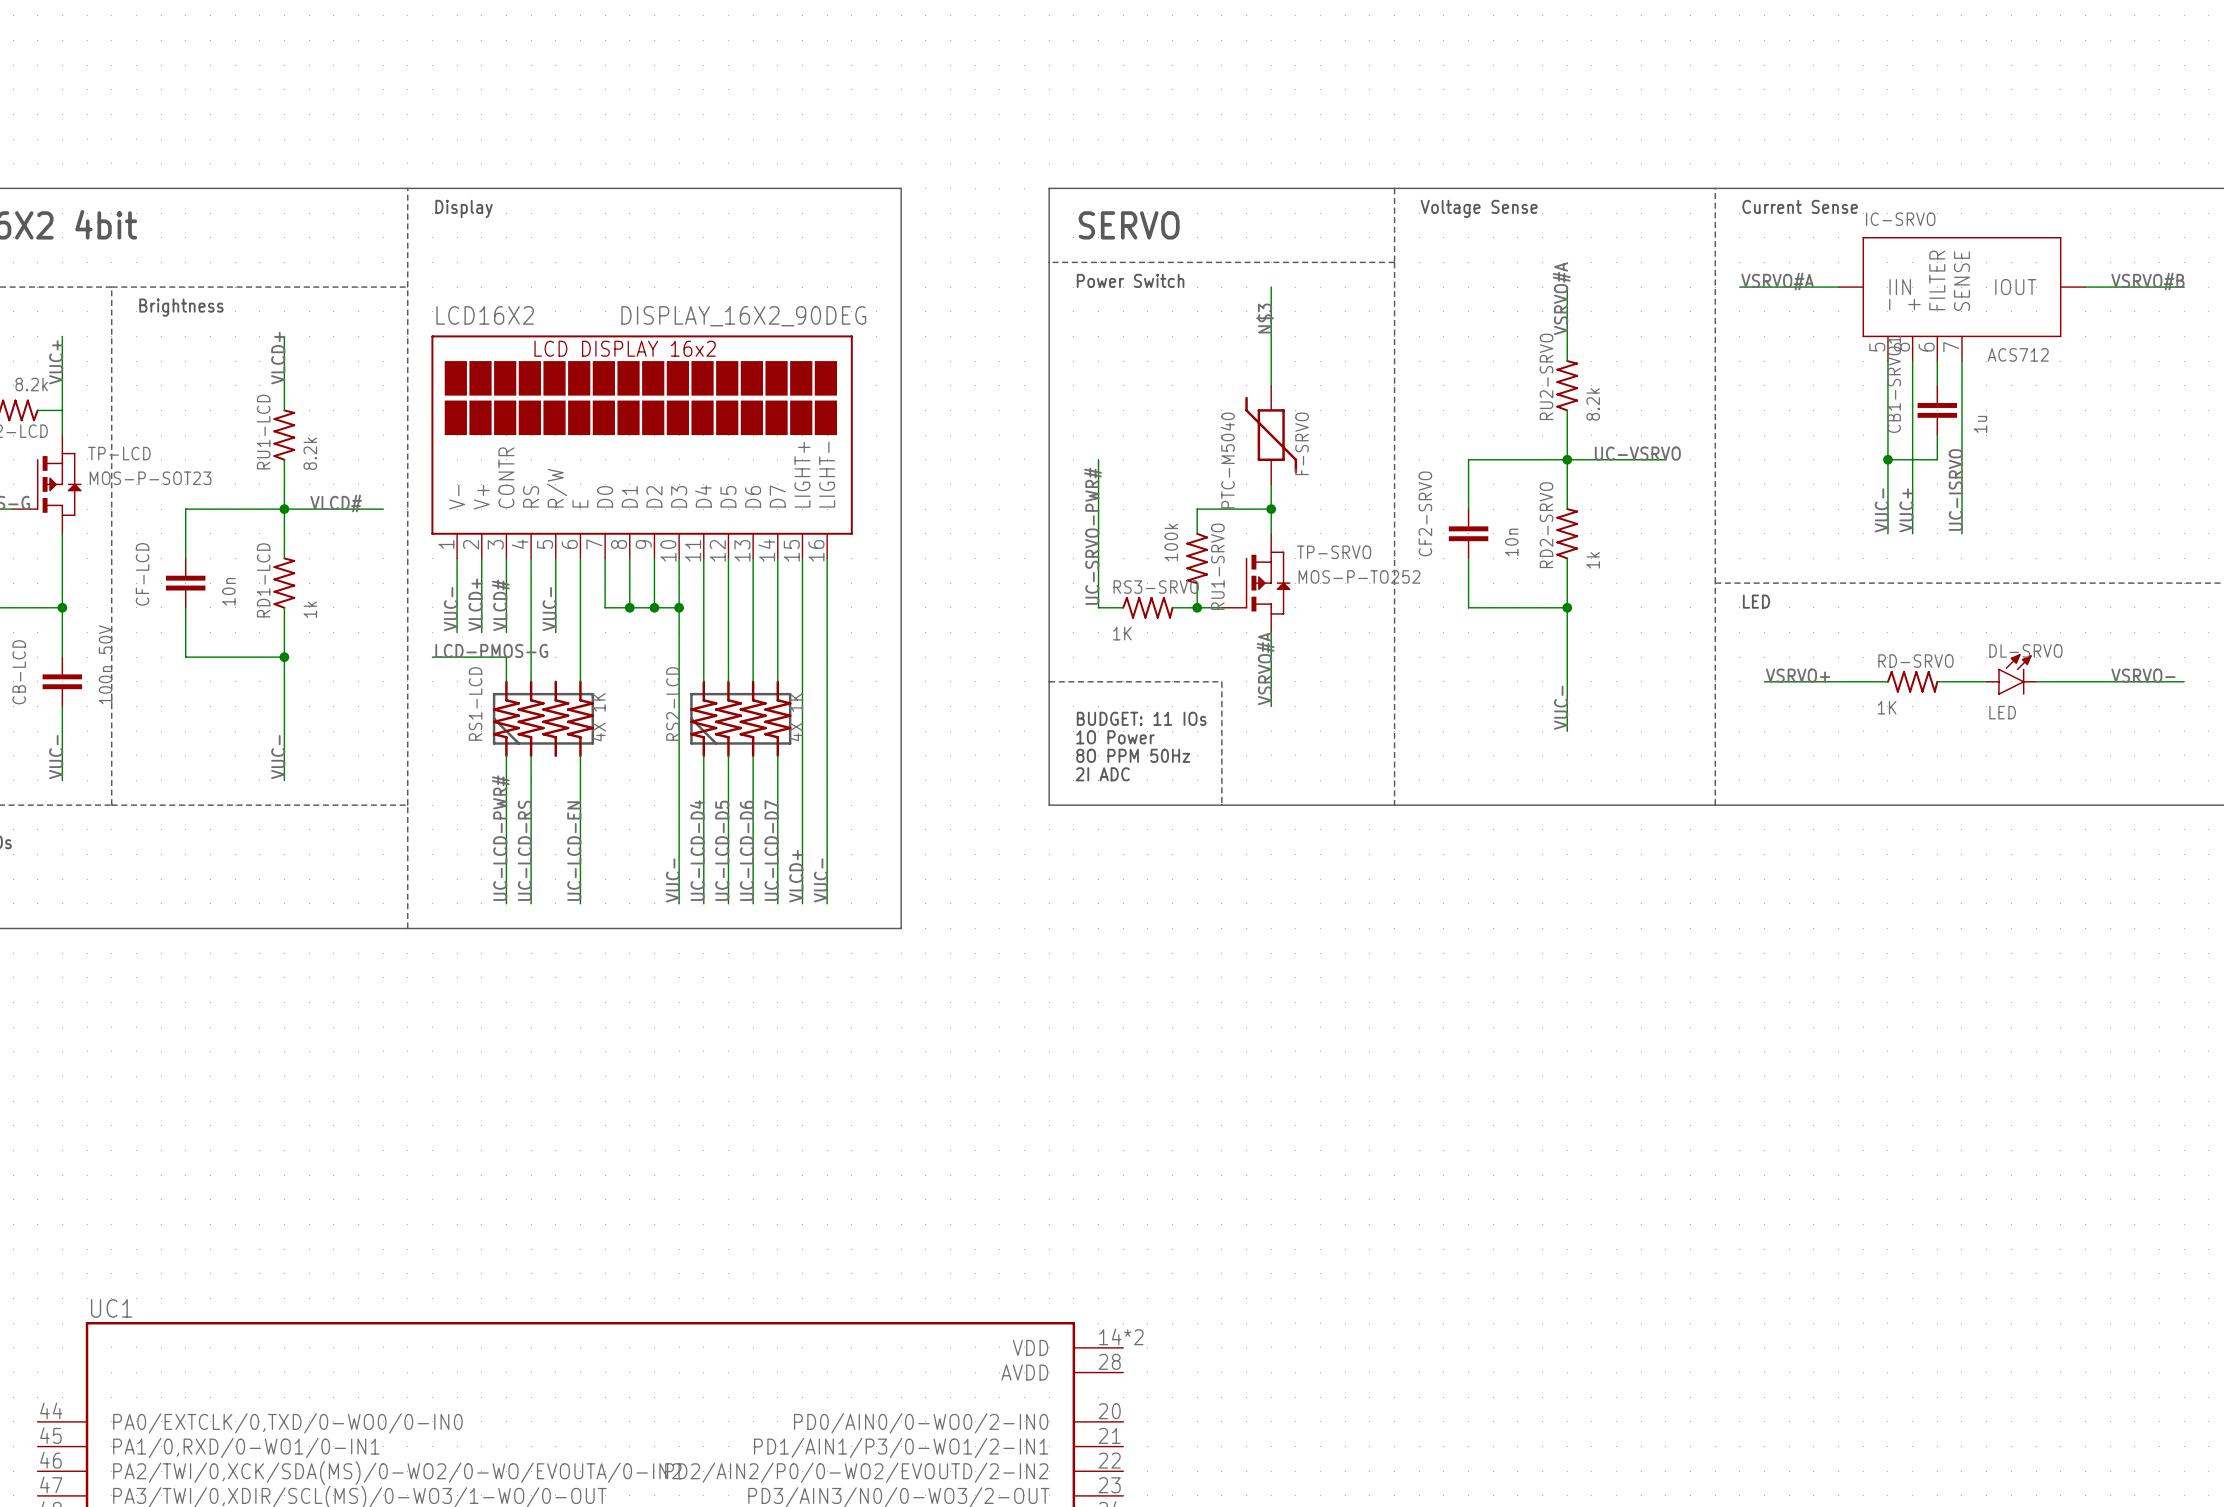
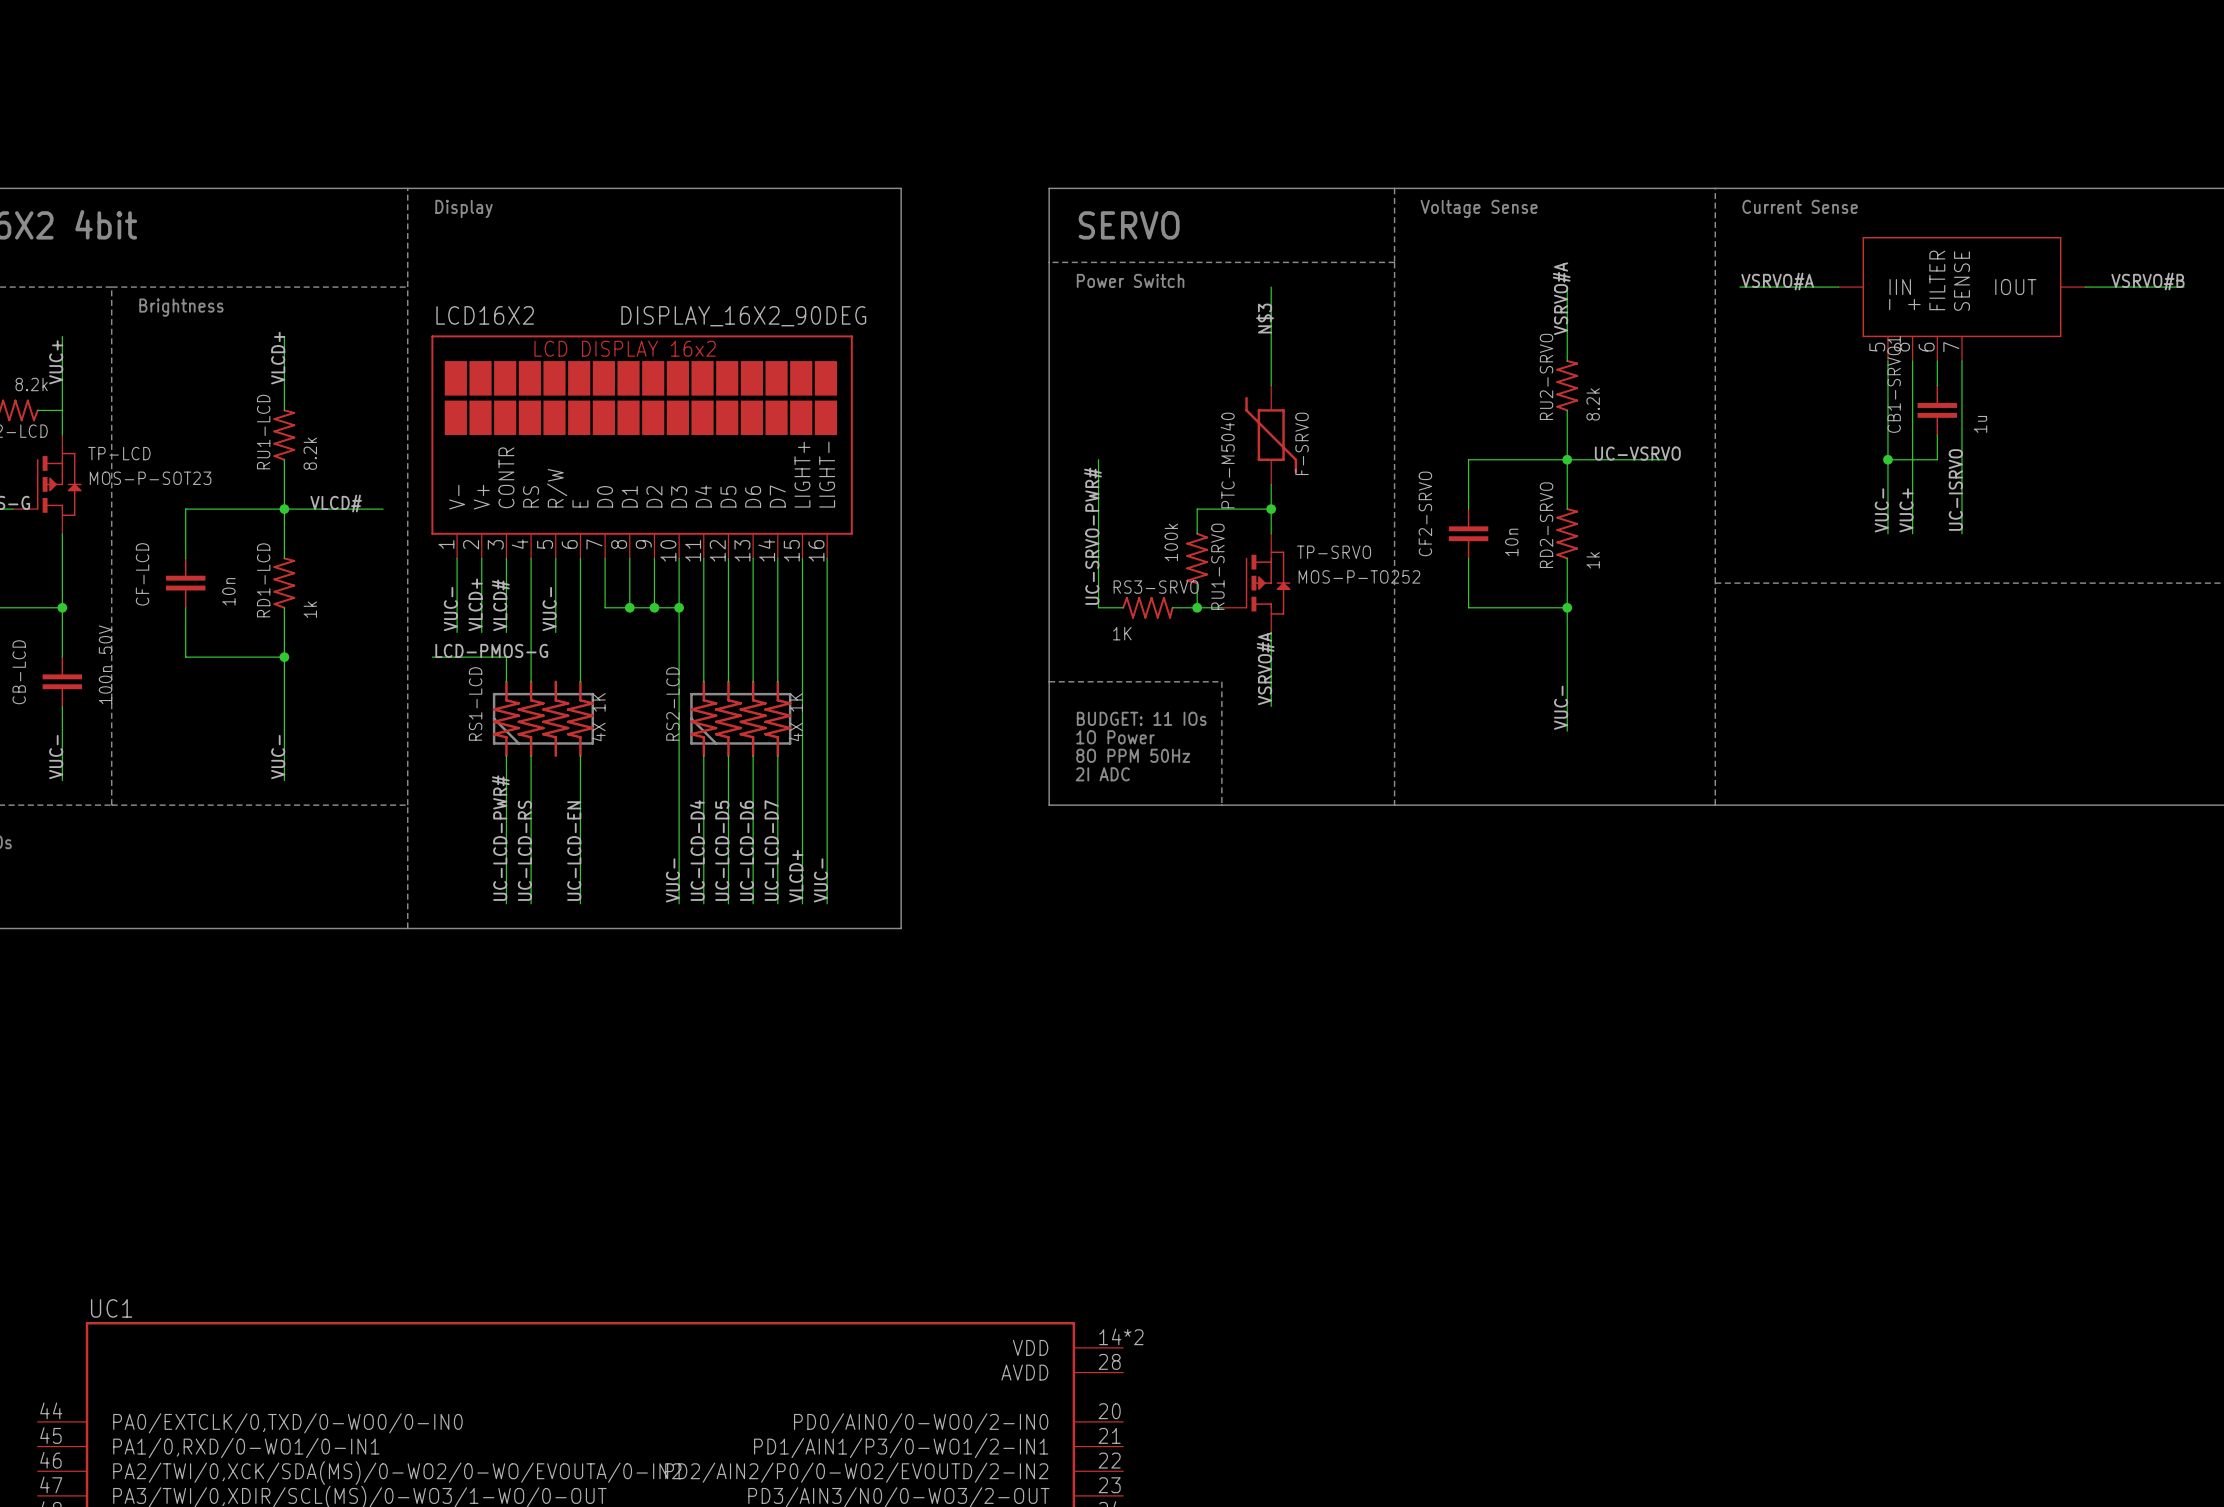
IC-SRVO name: IC-SRVO (1900, 219) -> none
IC-SRVO value: ACS712 (2018, 354) -> none
text: LED (1756, 601) -> none
DL-SRVO: LED (2011, 674) -> none
label: VSRVO+ (1798, 675) -> none
label: VSRVO- (2143, 675) -> none
wire: (1764, 681) (1887, 681) -> none
RD-SRVO: 1K (1912, 681) -> none
wire: (1937, 681) (1986, 681) -> none
wire: (2036, 681) (2184, 681) -> none

